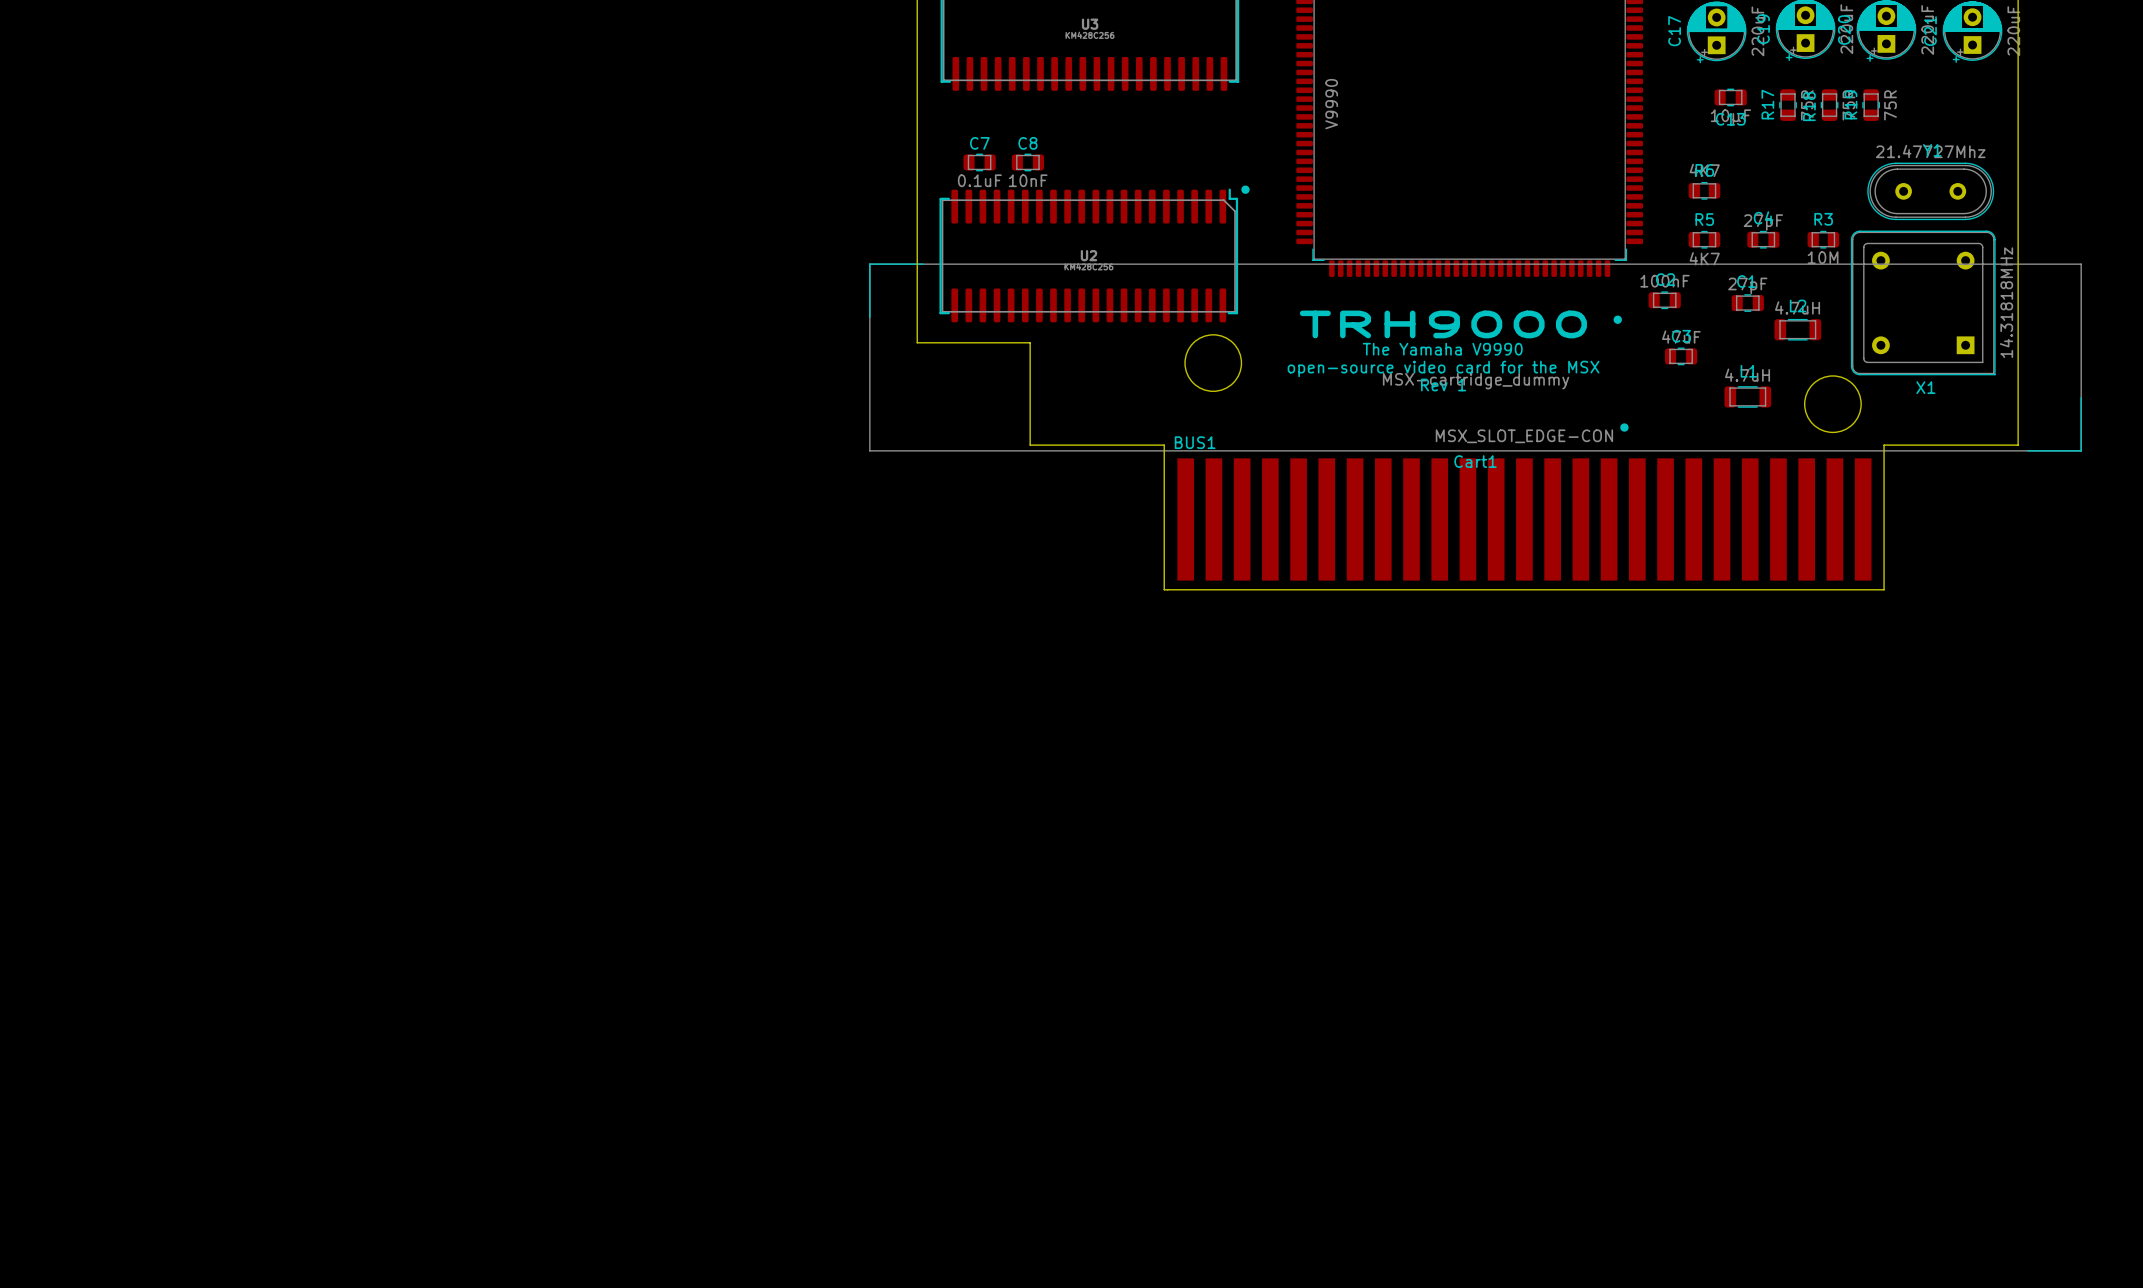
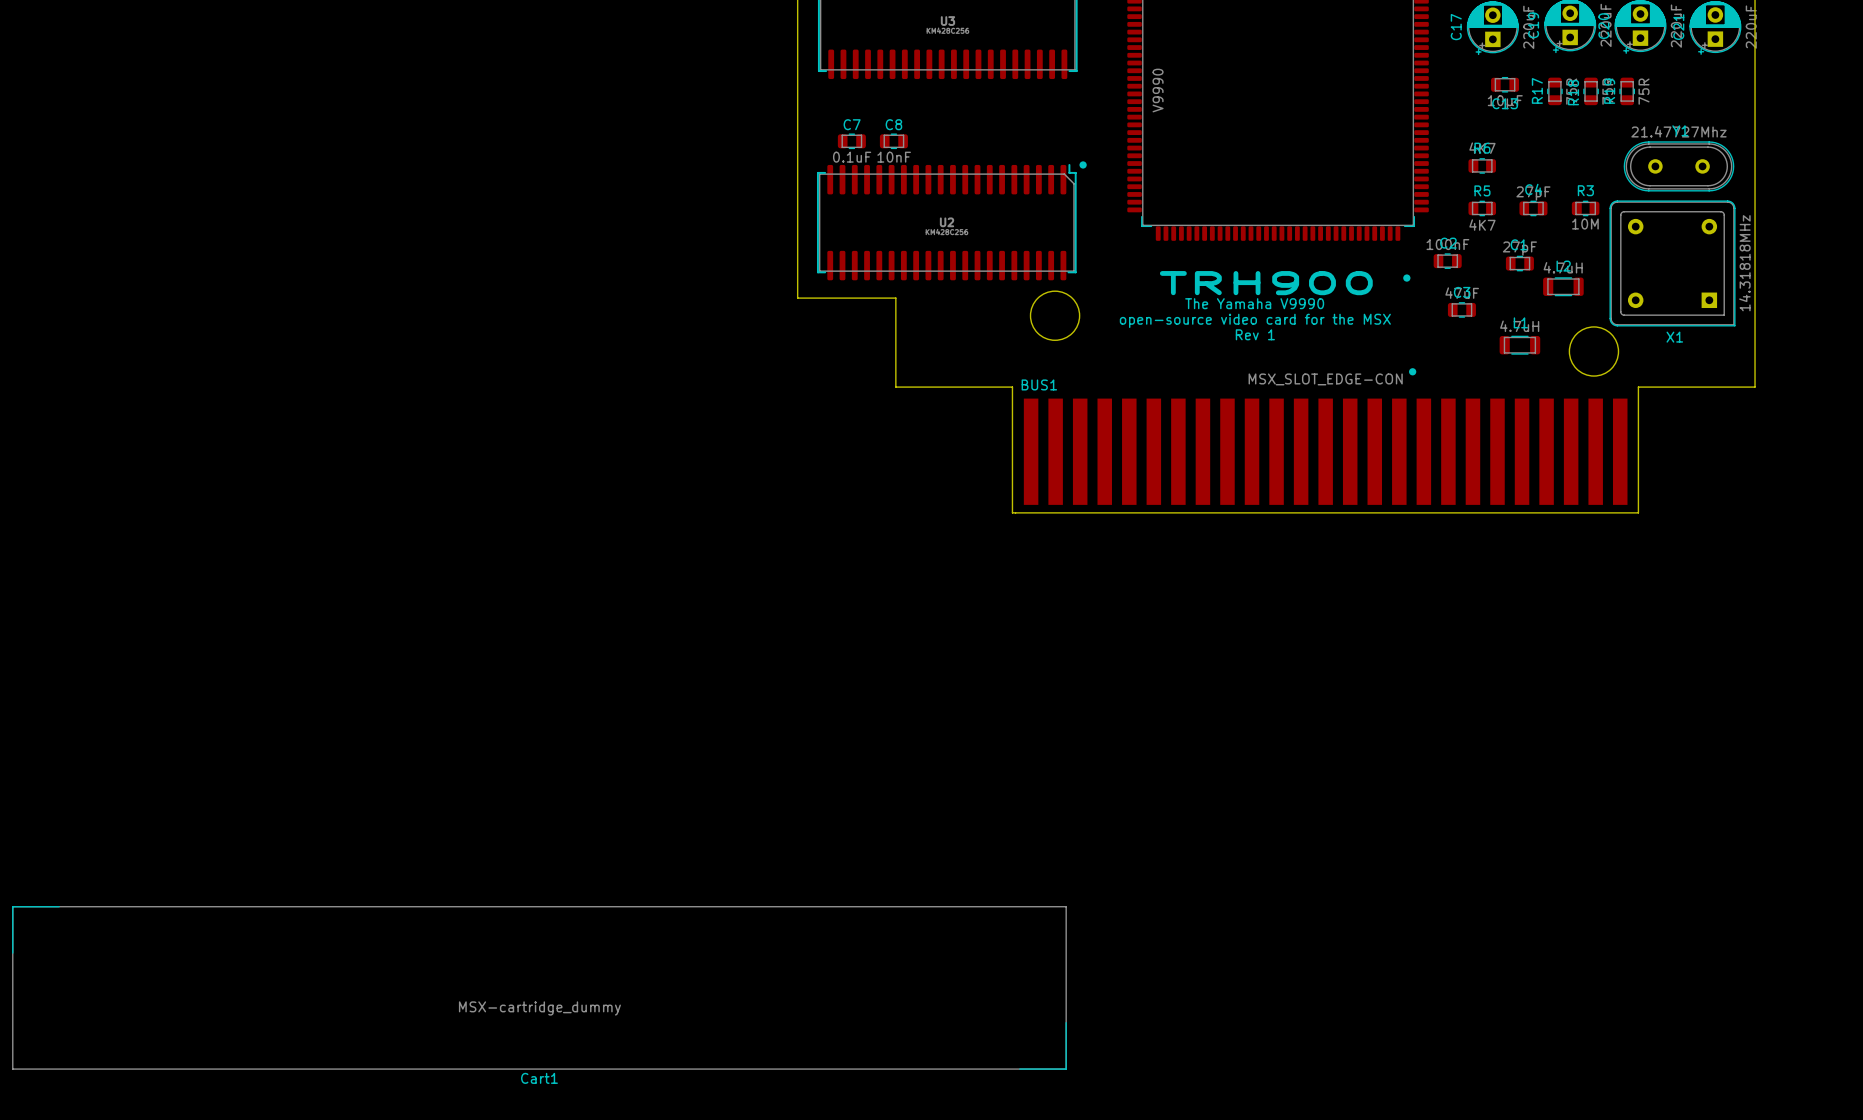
text: TRH9000 (1443, 324) -> TRH900 (1266, 283)
Cart1 position: (1475, 357) -> (539, 987)

